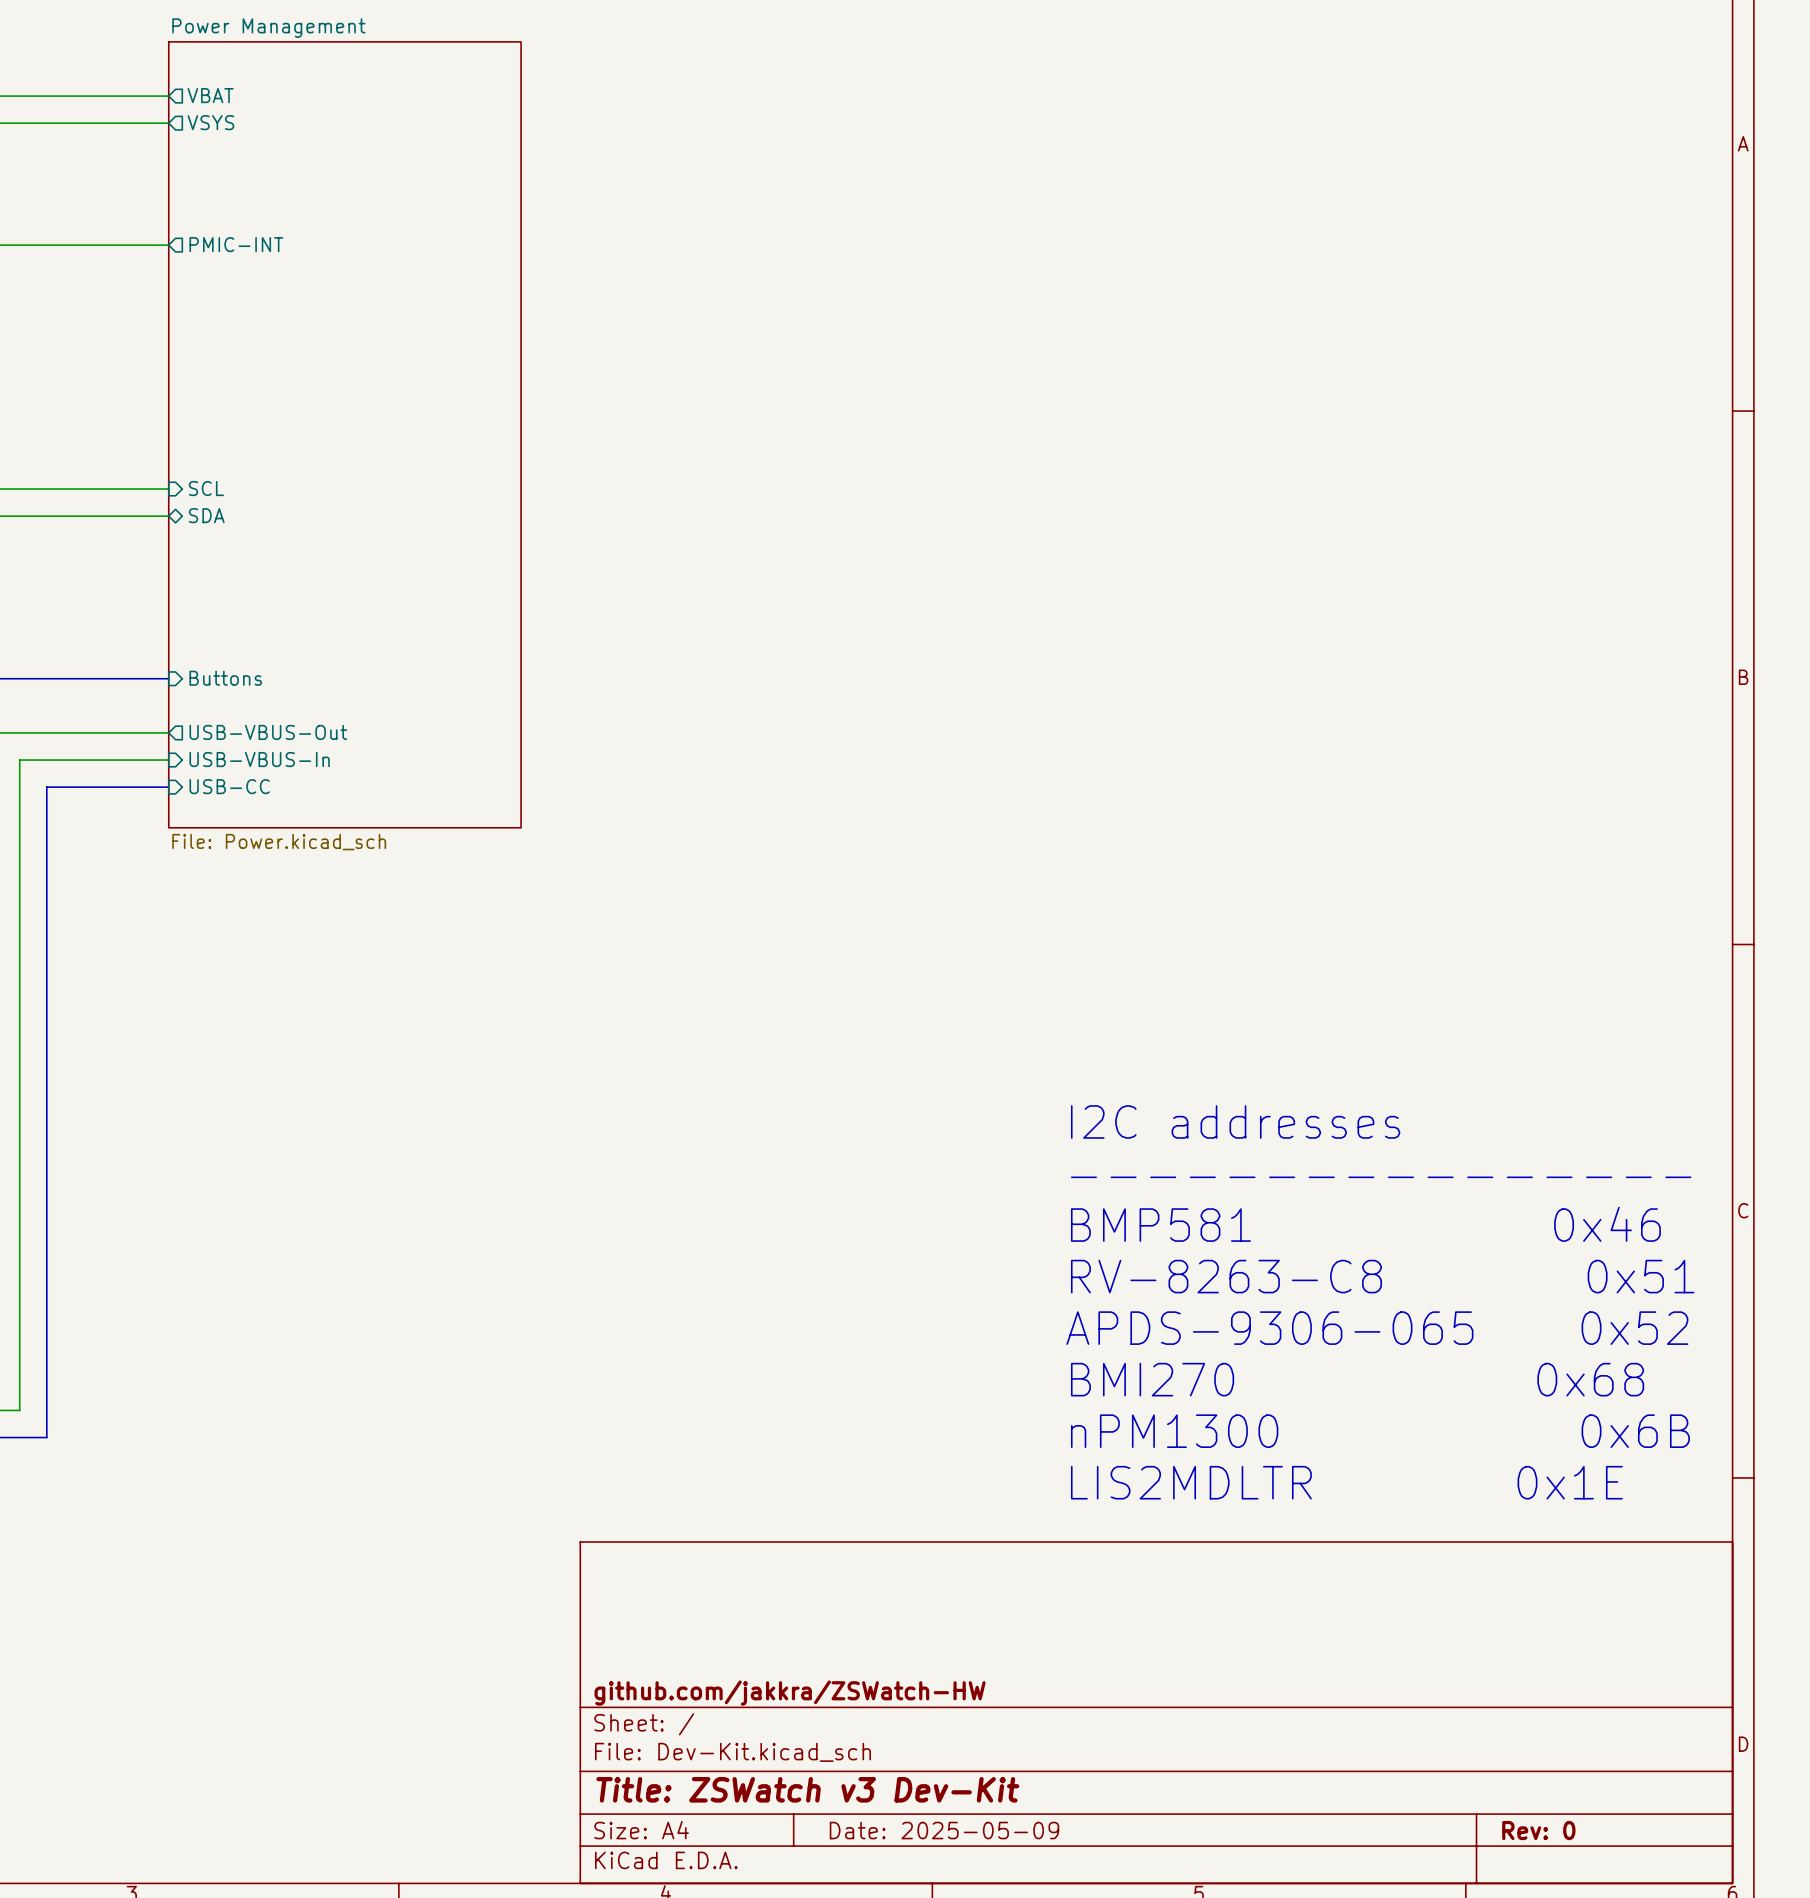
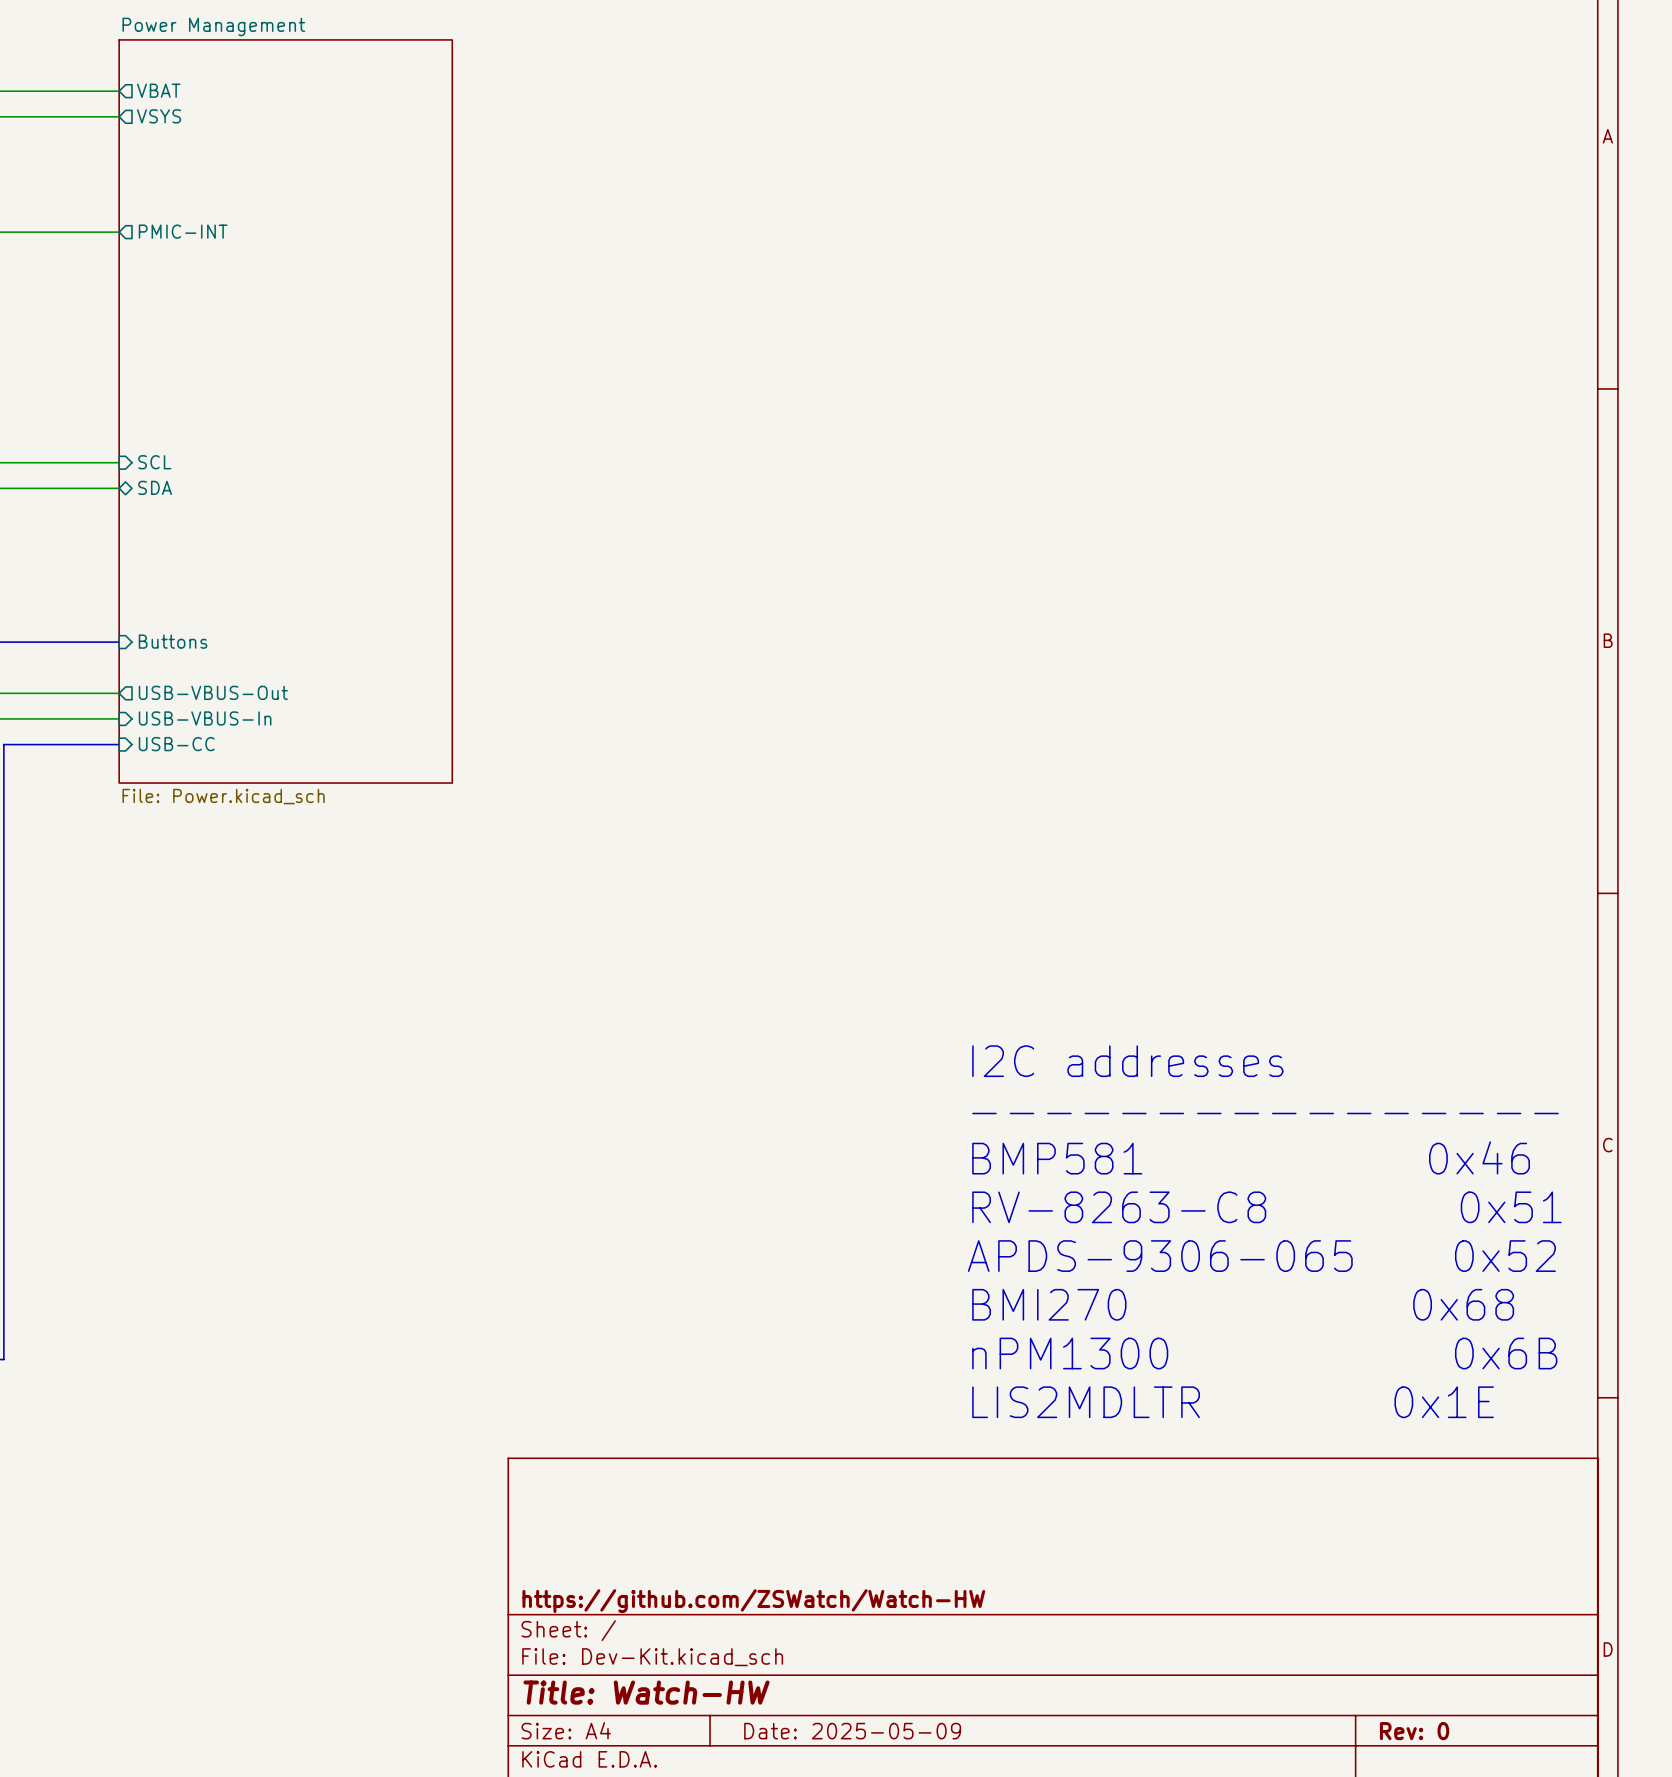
title block: github.com/jakkra/ZSWatch-HW (790, 1693) -> https://github.com/ZSWatch/Watch-HW (753, 1601)
title block: Title: ZSWatch v3 Dev-Kit (807, 1789) -> Title: Watch-HW (646, 1692)

